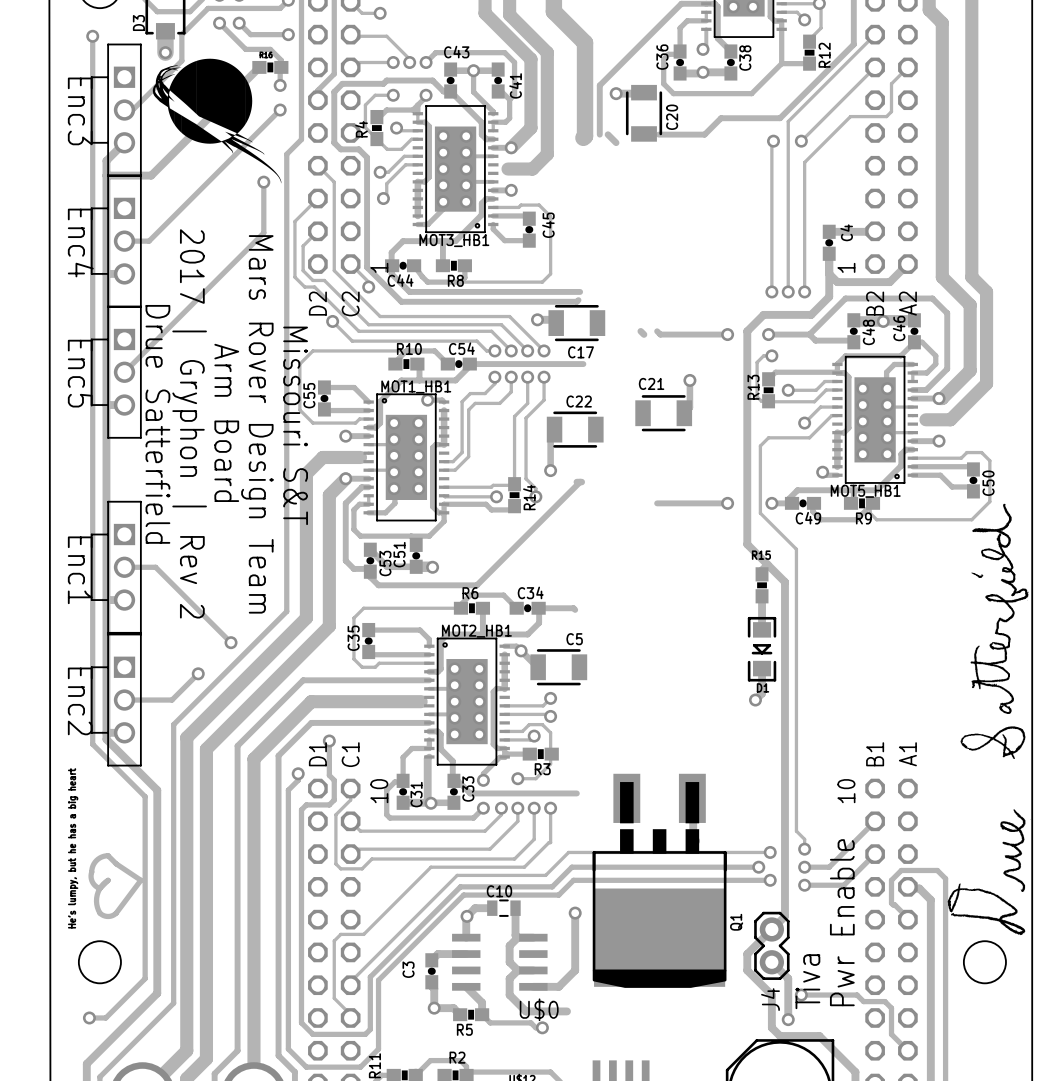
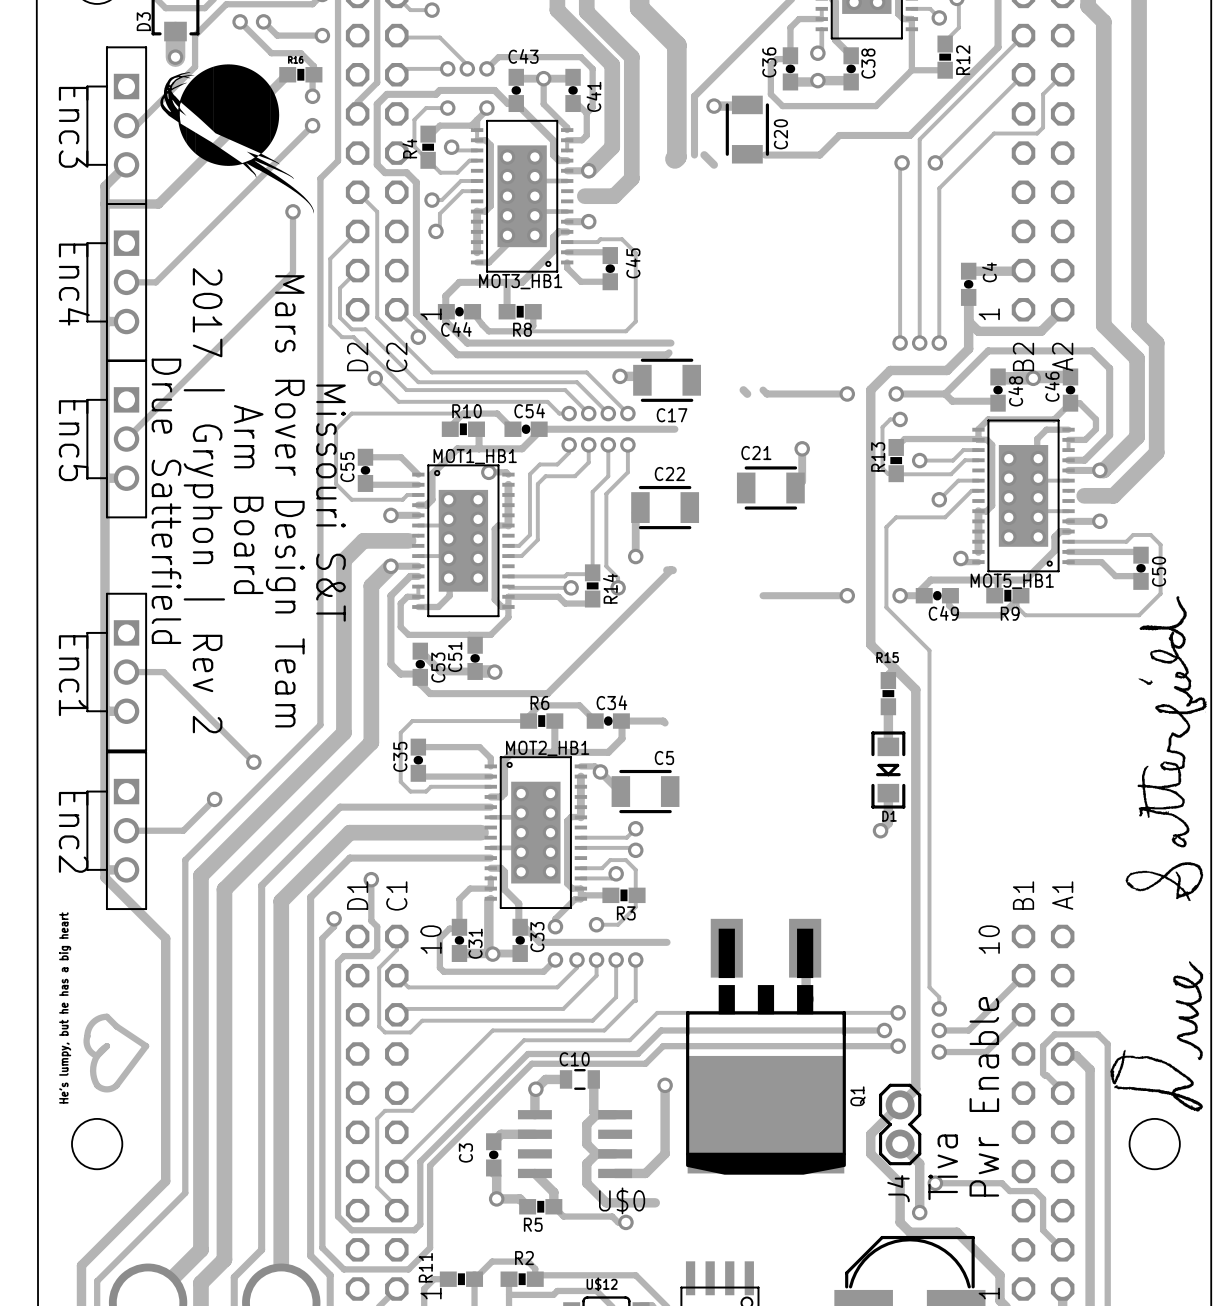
track: (92, 36) (92, 744) (145, 796) (145, 978) (105, 1017) (89, 1017) -> none
via: (92, 36) -> none
via: (89, 1017) -> none

